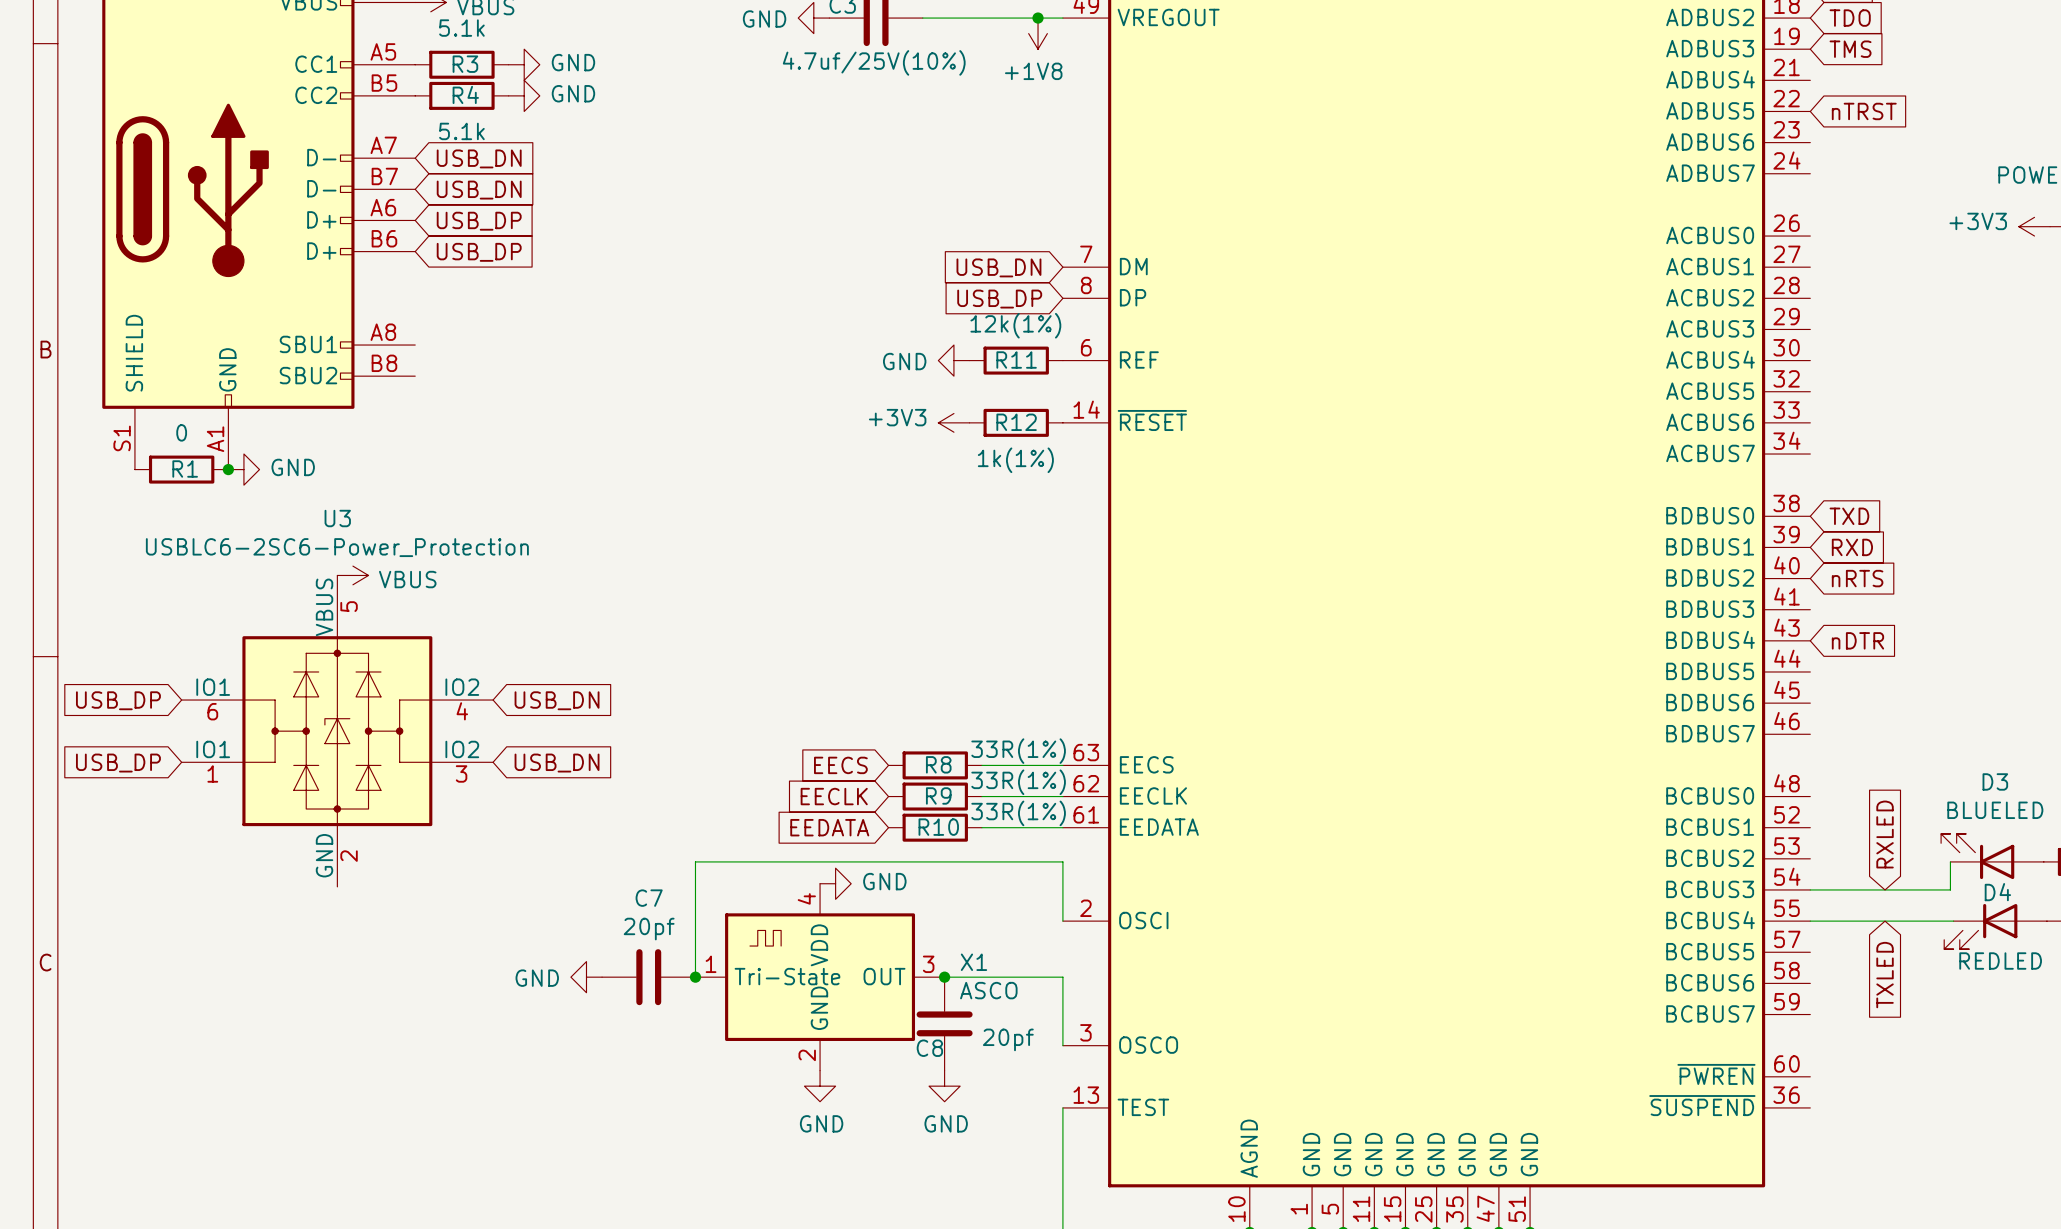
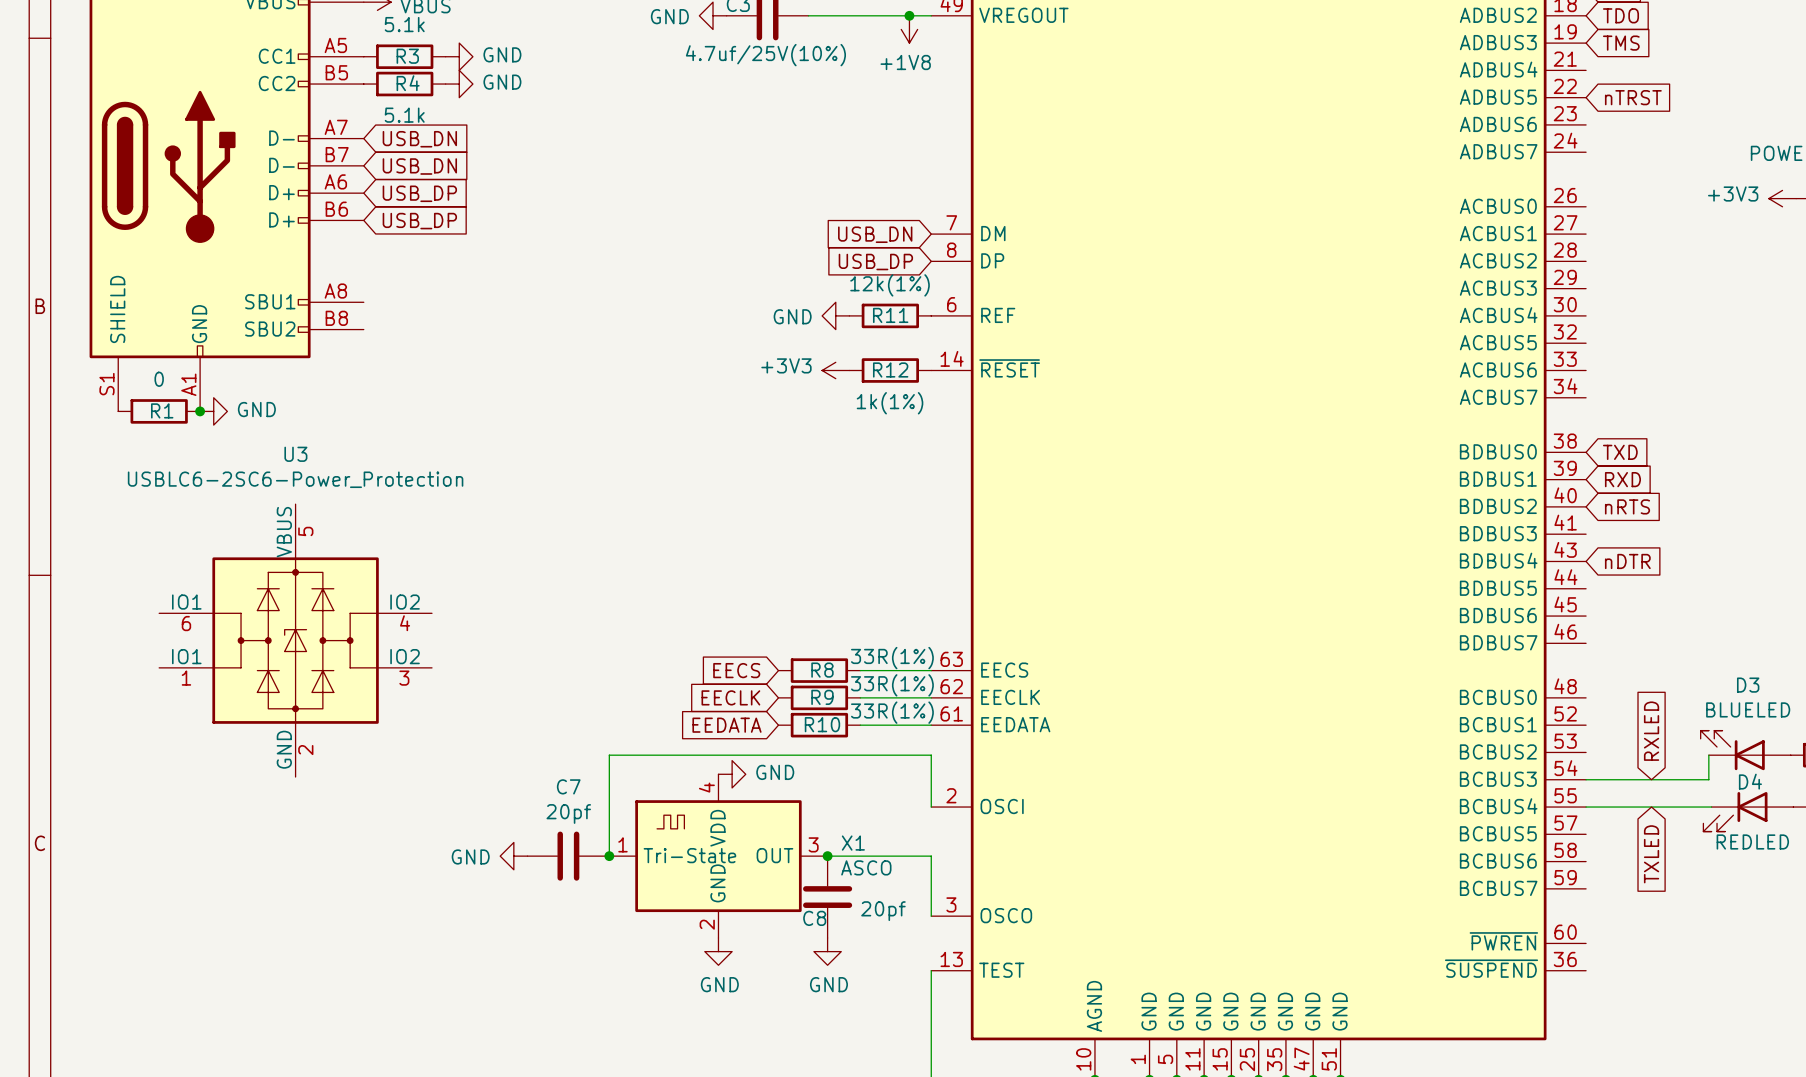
power symbol: VBUS (352, 575) -> none
global label: USB_DP (118, 700) -> none
global label: USB_DN (557, 700) -> none
global label: USB_DP (118, 763) -> none
global label: USB_DN (557, 763) -> none

